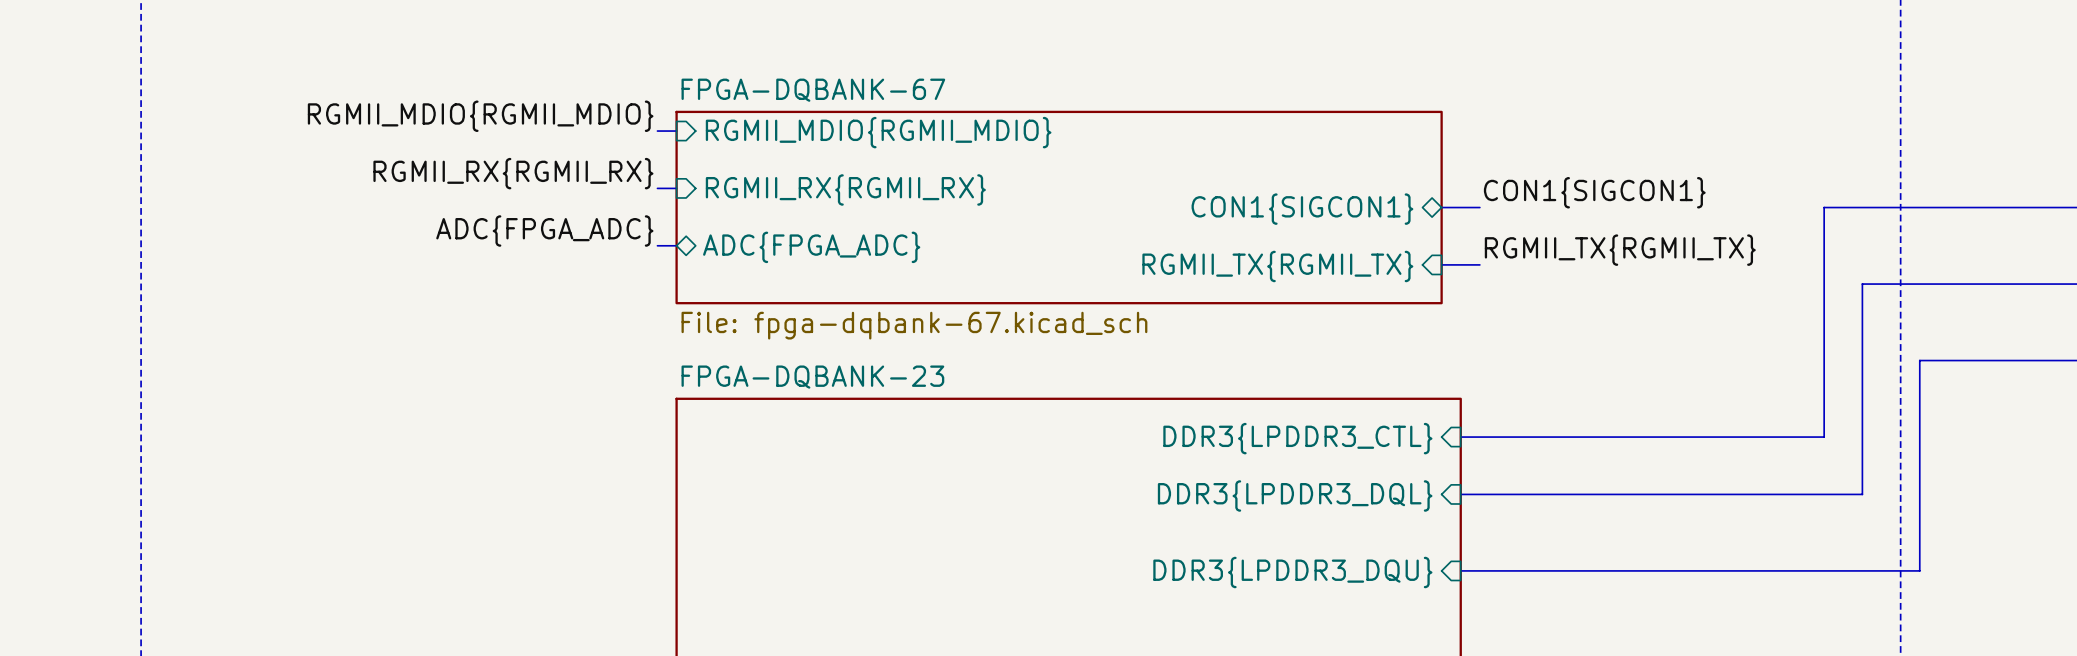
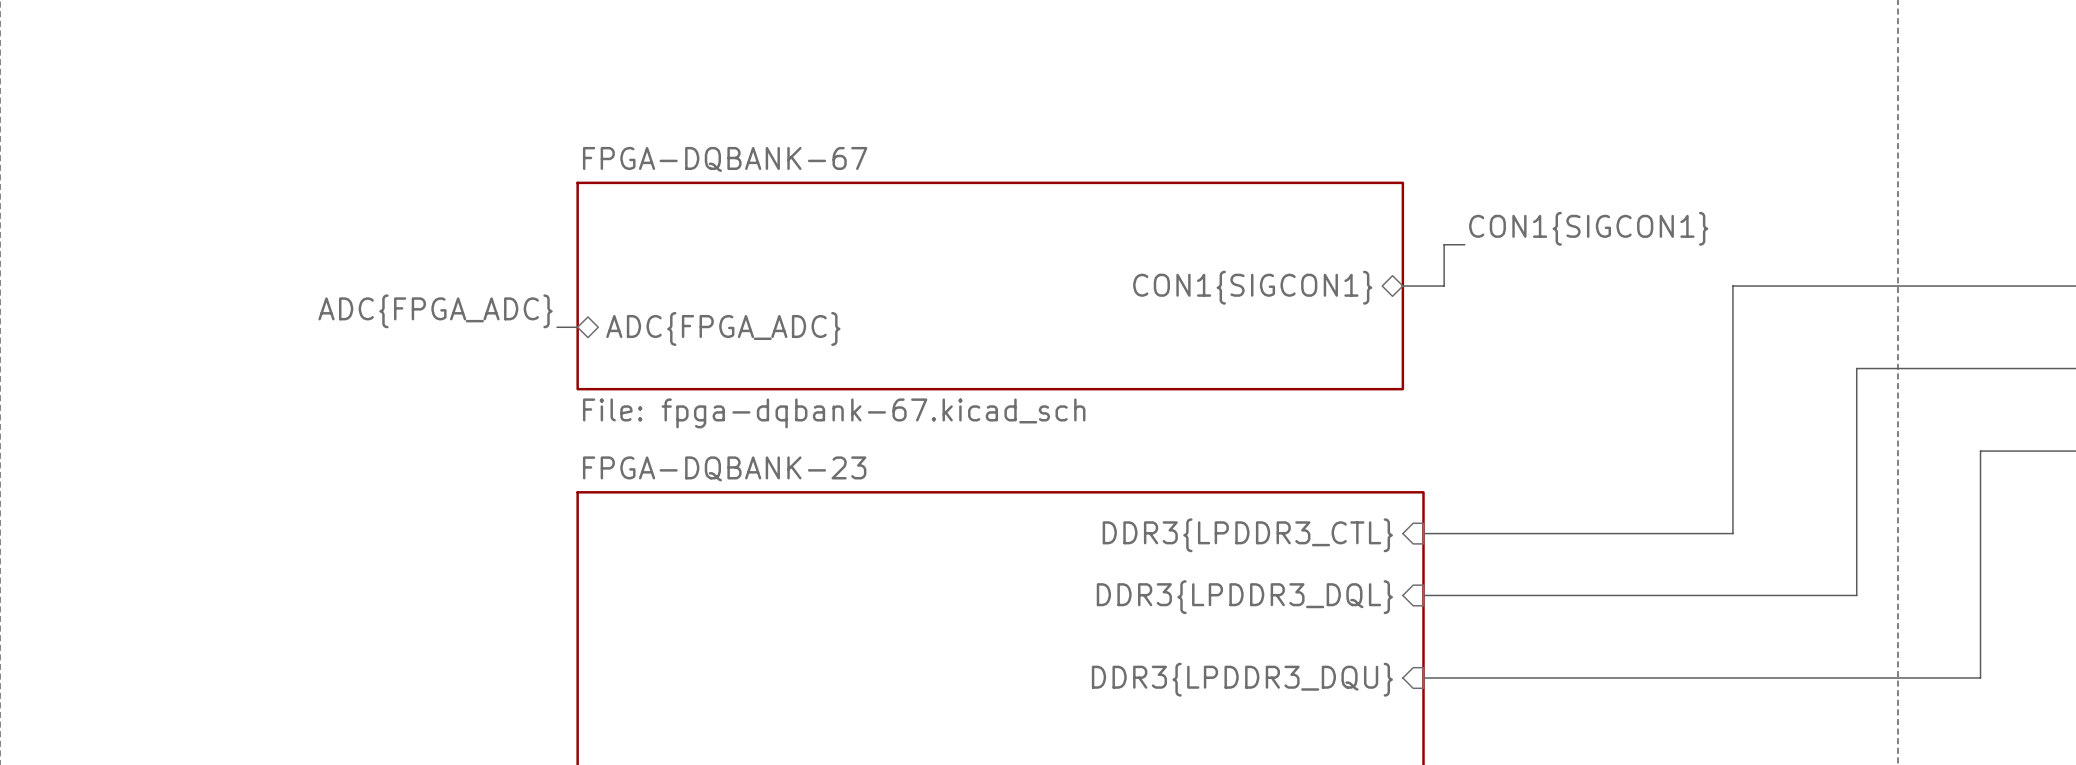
label: RGMII_MDIO{RGMII_MDIO} (480, 116) -> none
bus: (657, 131) (676, 131) -> none
sheet pin: RGMII_MDIO{RGMII_MDIO} (878, 132) -> none
bus: none -> (1464, 244) (1444, 244) (1444, 286)
label: RGMII_RX{RGMII_RX} (513, 173) -> none
bus: (657, 188) (676, 188) -> none
sheet pin: RGMII_RX{RGMII_RX} (845, 189) -> none
label position: CON1{SIGCON1} (1594, 192) -> CON1{SIGCON1} (1588, 228)
bus: (1824, 207) (1824, 437) (1747, 437) -> (1815, 286) (1732, 286) (1732, 533)
label: RGMII_TX{RGMII_TX} (1620, 250) -> none
bus: (1441, 264) (1479, 264) -> none
sheet pin: RGMII_TX{RGMII_TX} (1277, 266) -> none
bus: (1977, 360) (1919, 360) (1919, 570) -> (1980, 451) (1980, 677) (1918, 677)

